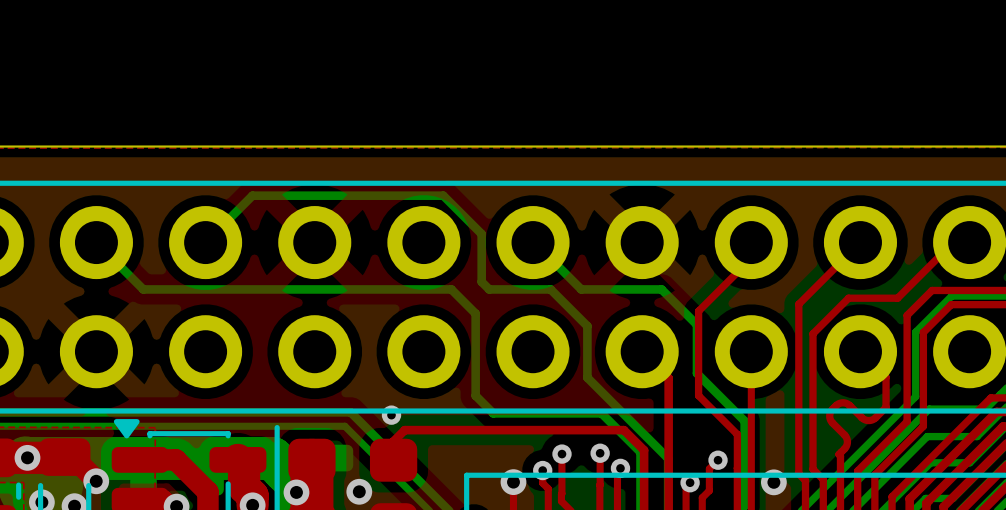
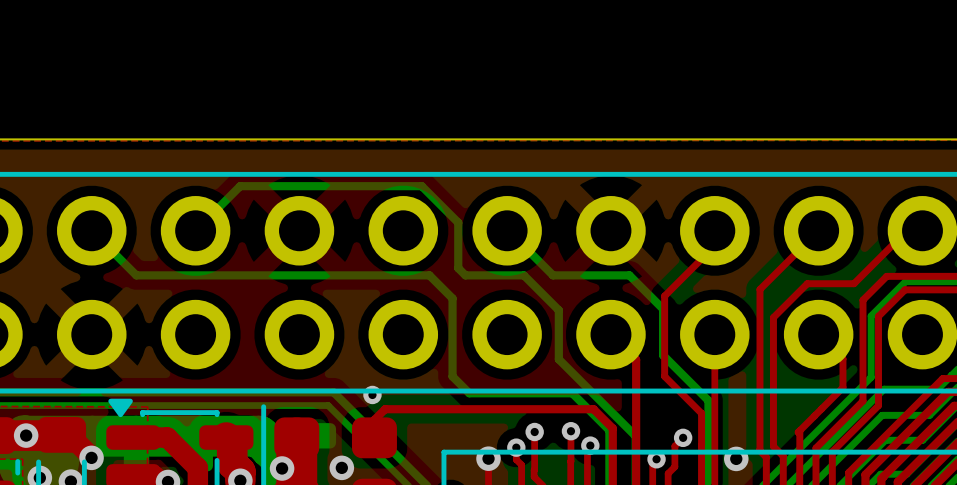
top track: (875, 417) (870, 420) (864, 419) (845, 403) (838, 403) (832, 409) (829, 413) (830, 419) (846, 437) (847, 443) (844, 448) -> (833, 397) (803, 427)

